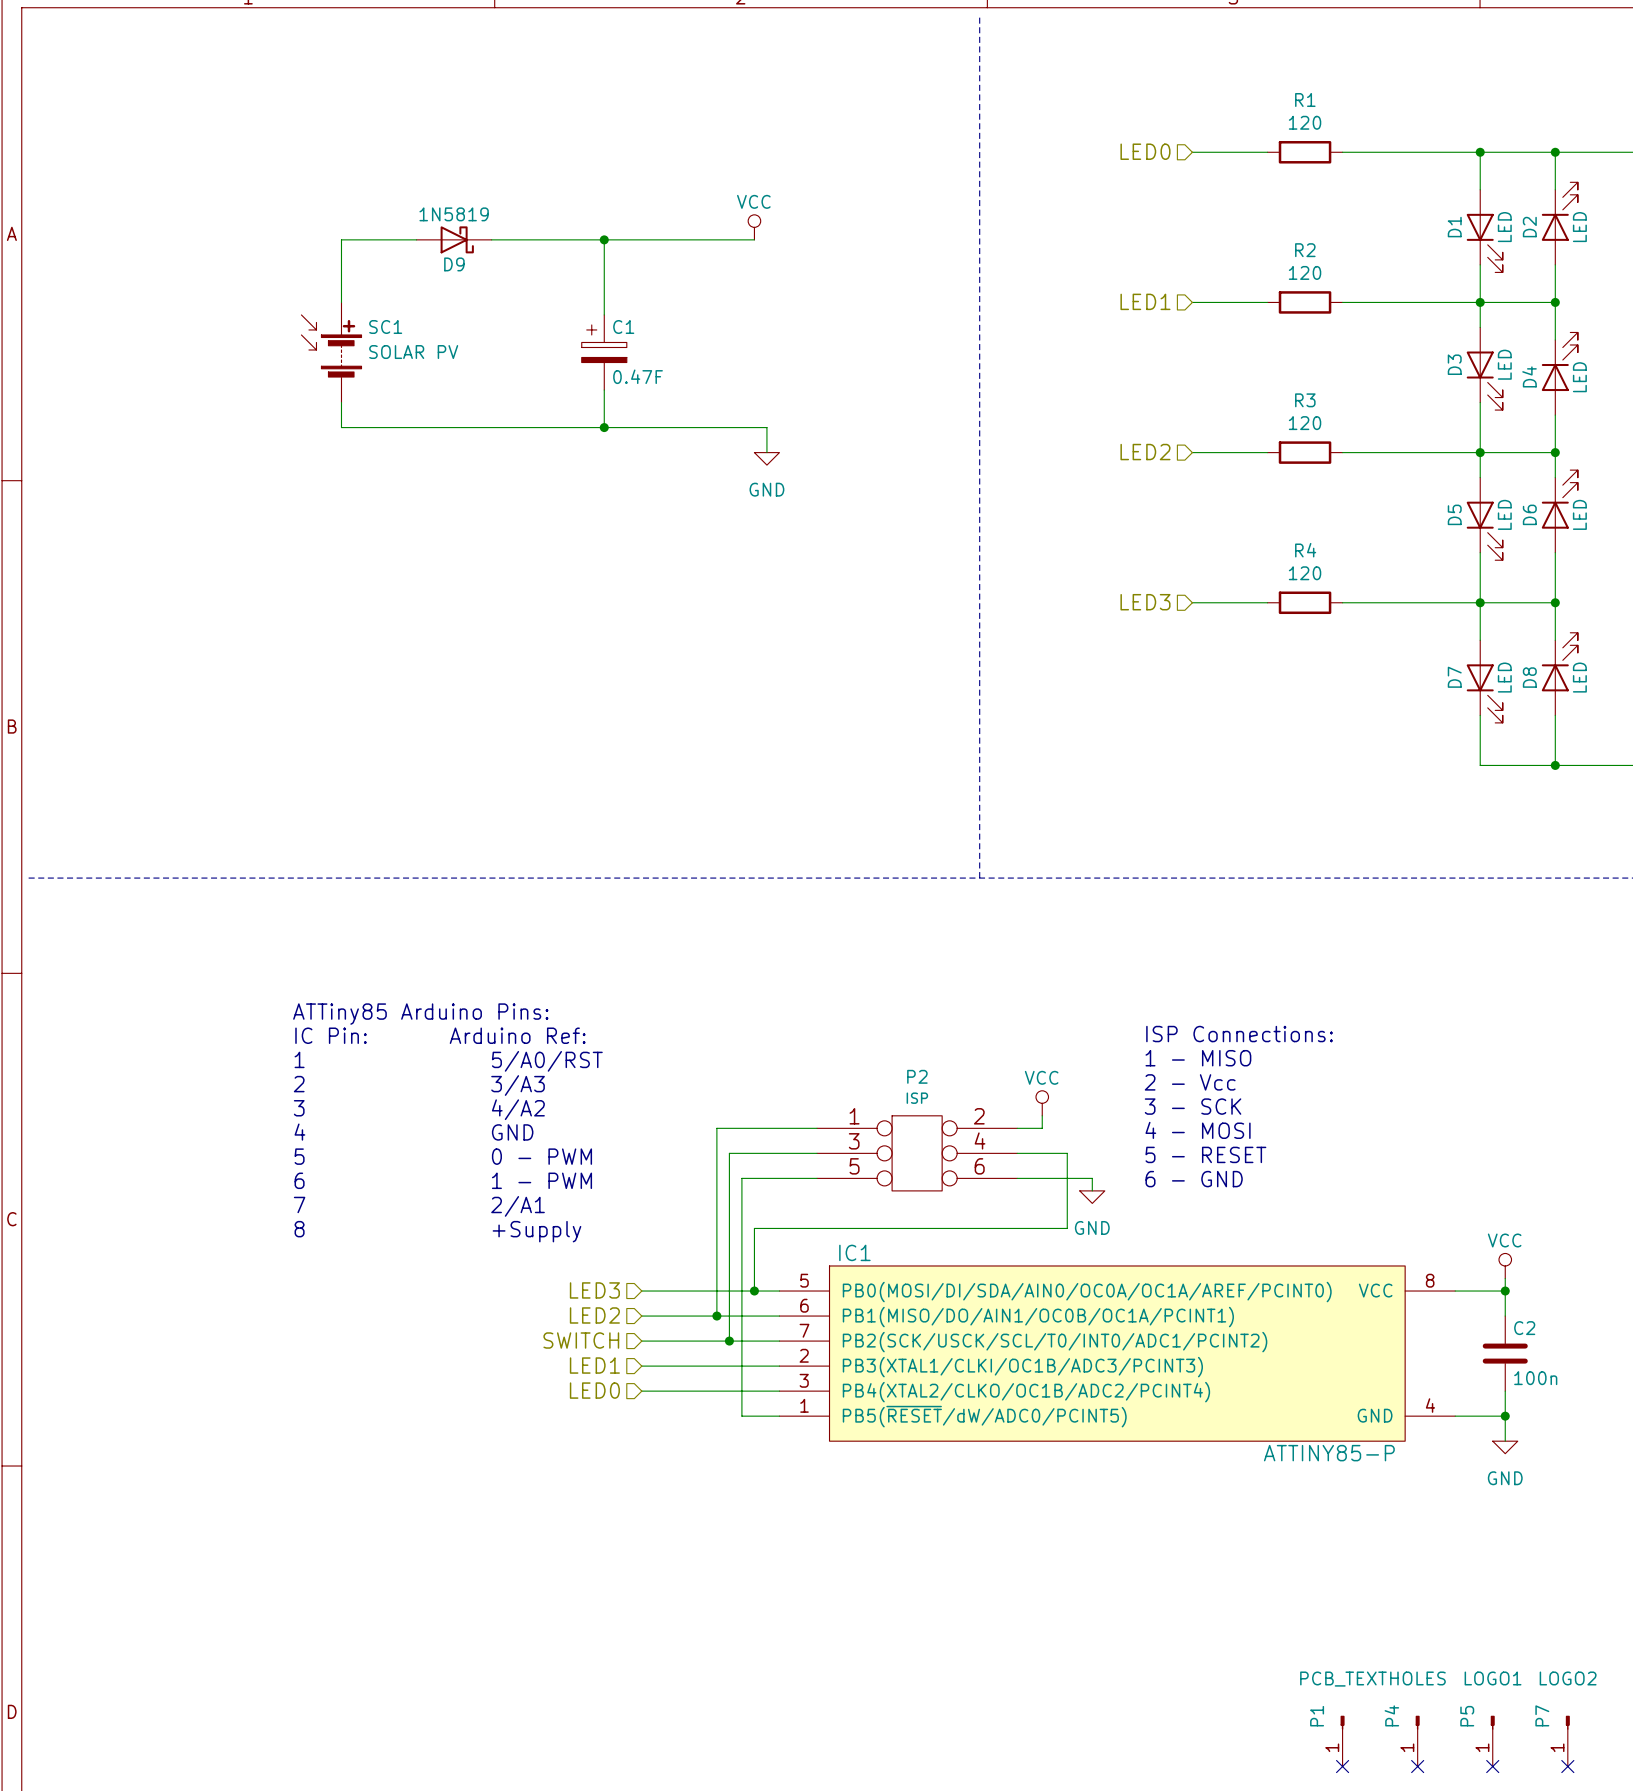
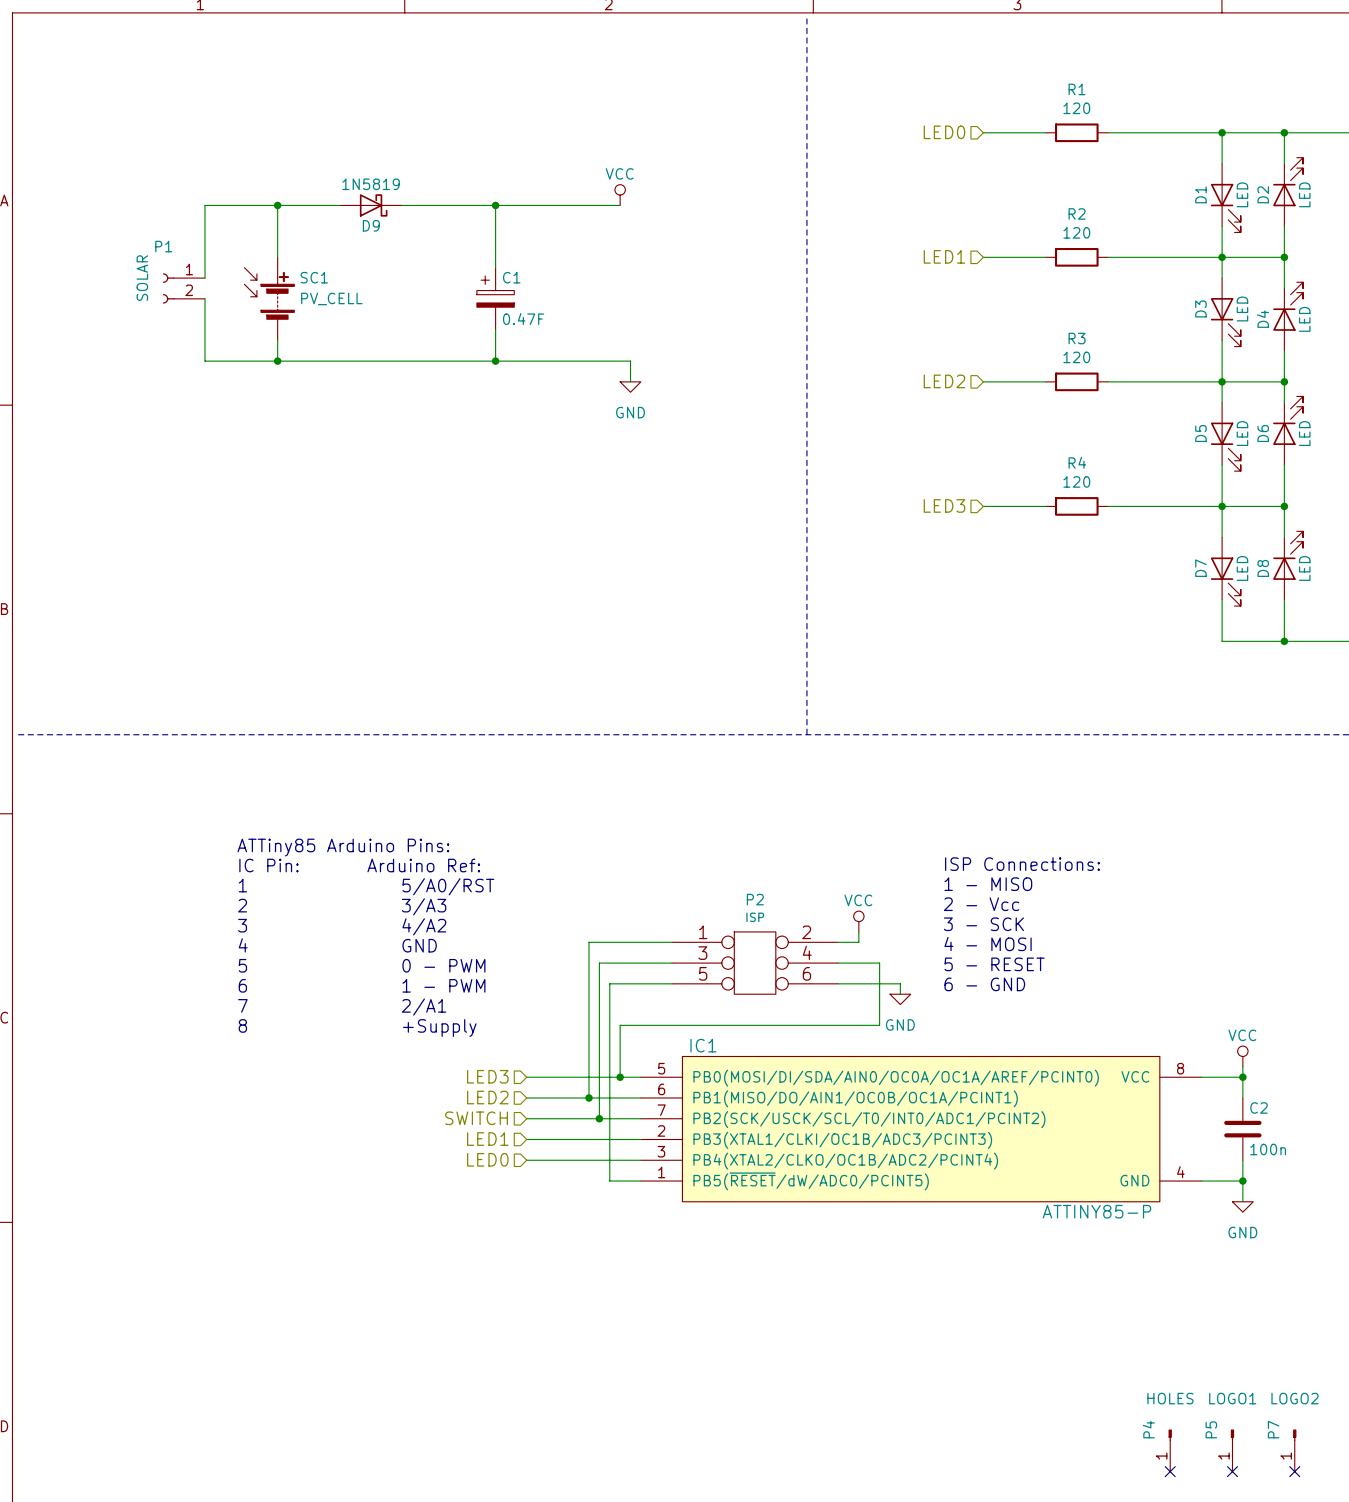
wire: none -> (277, 205) (205, 205) (205, 278)
junction: none -> (277, 205)
wire: none -> (205, 298) (205, 361) (277, 361)
SC1 value: SOLAR PV (413, 352) -> PV_CELL (331, 298)
junction: none -> (277, 361)
P1 value: PCB_TEXT (1343, 1679) -> SOLAR (142, 278)
P1 symbol: [1340, 1715, 1345, 1767] -> [162, 273, 206, 304]
P1 name position: P1 (1317, 1716) -> P1 (163, 246)
no-connect mark: (1342, 1766) -> none

